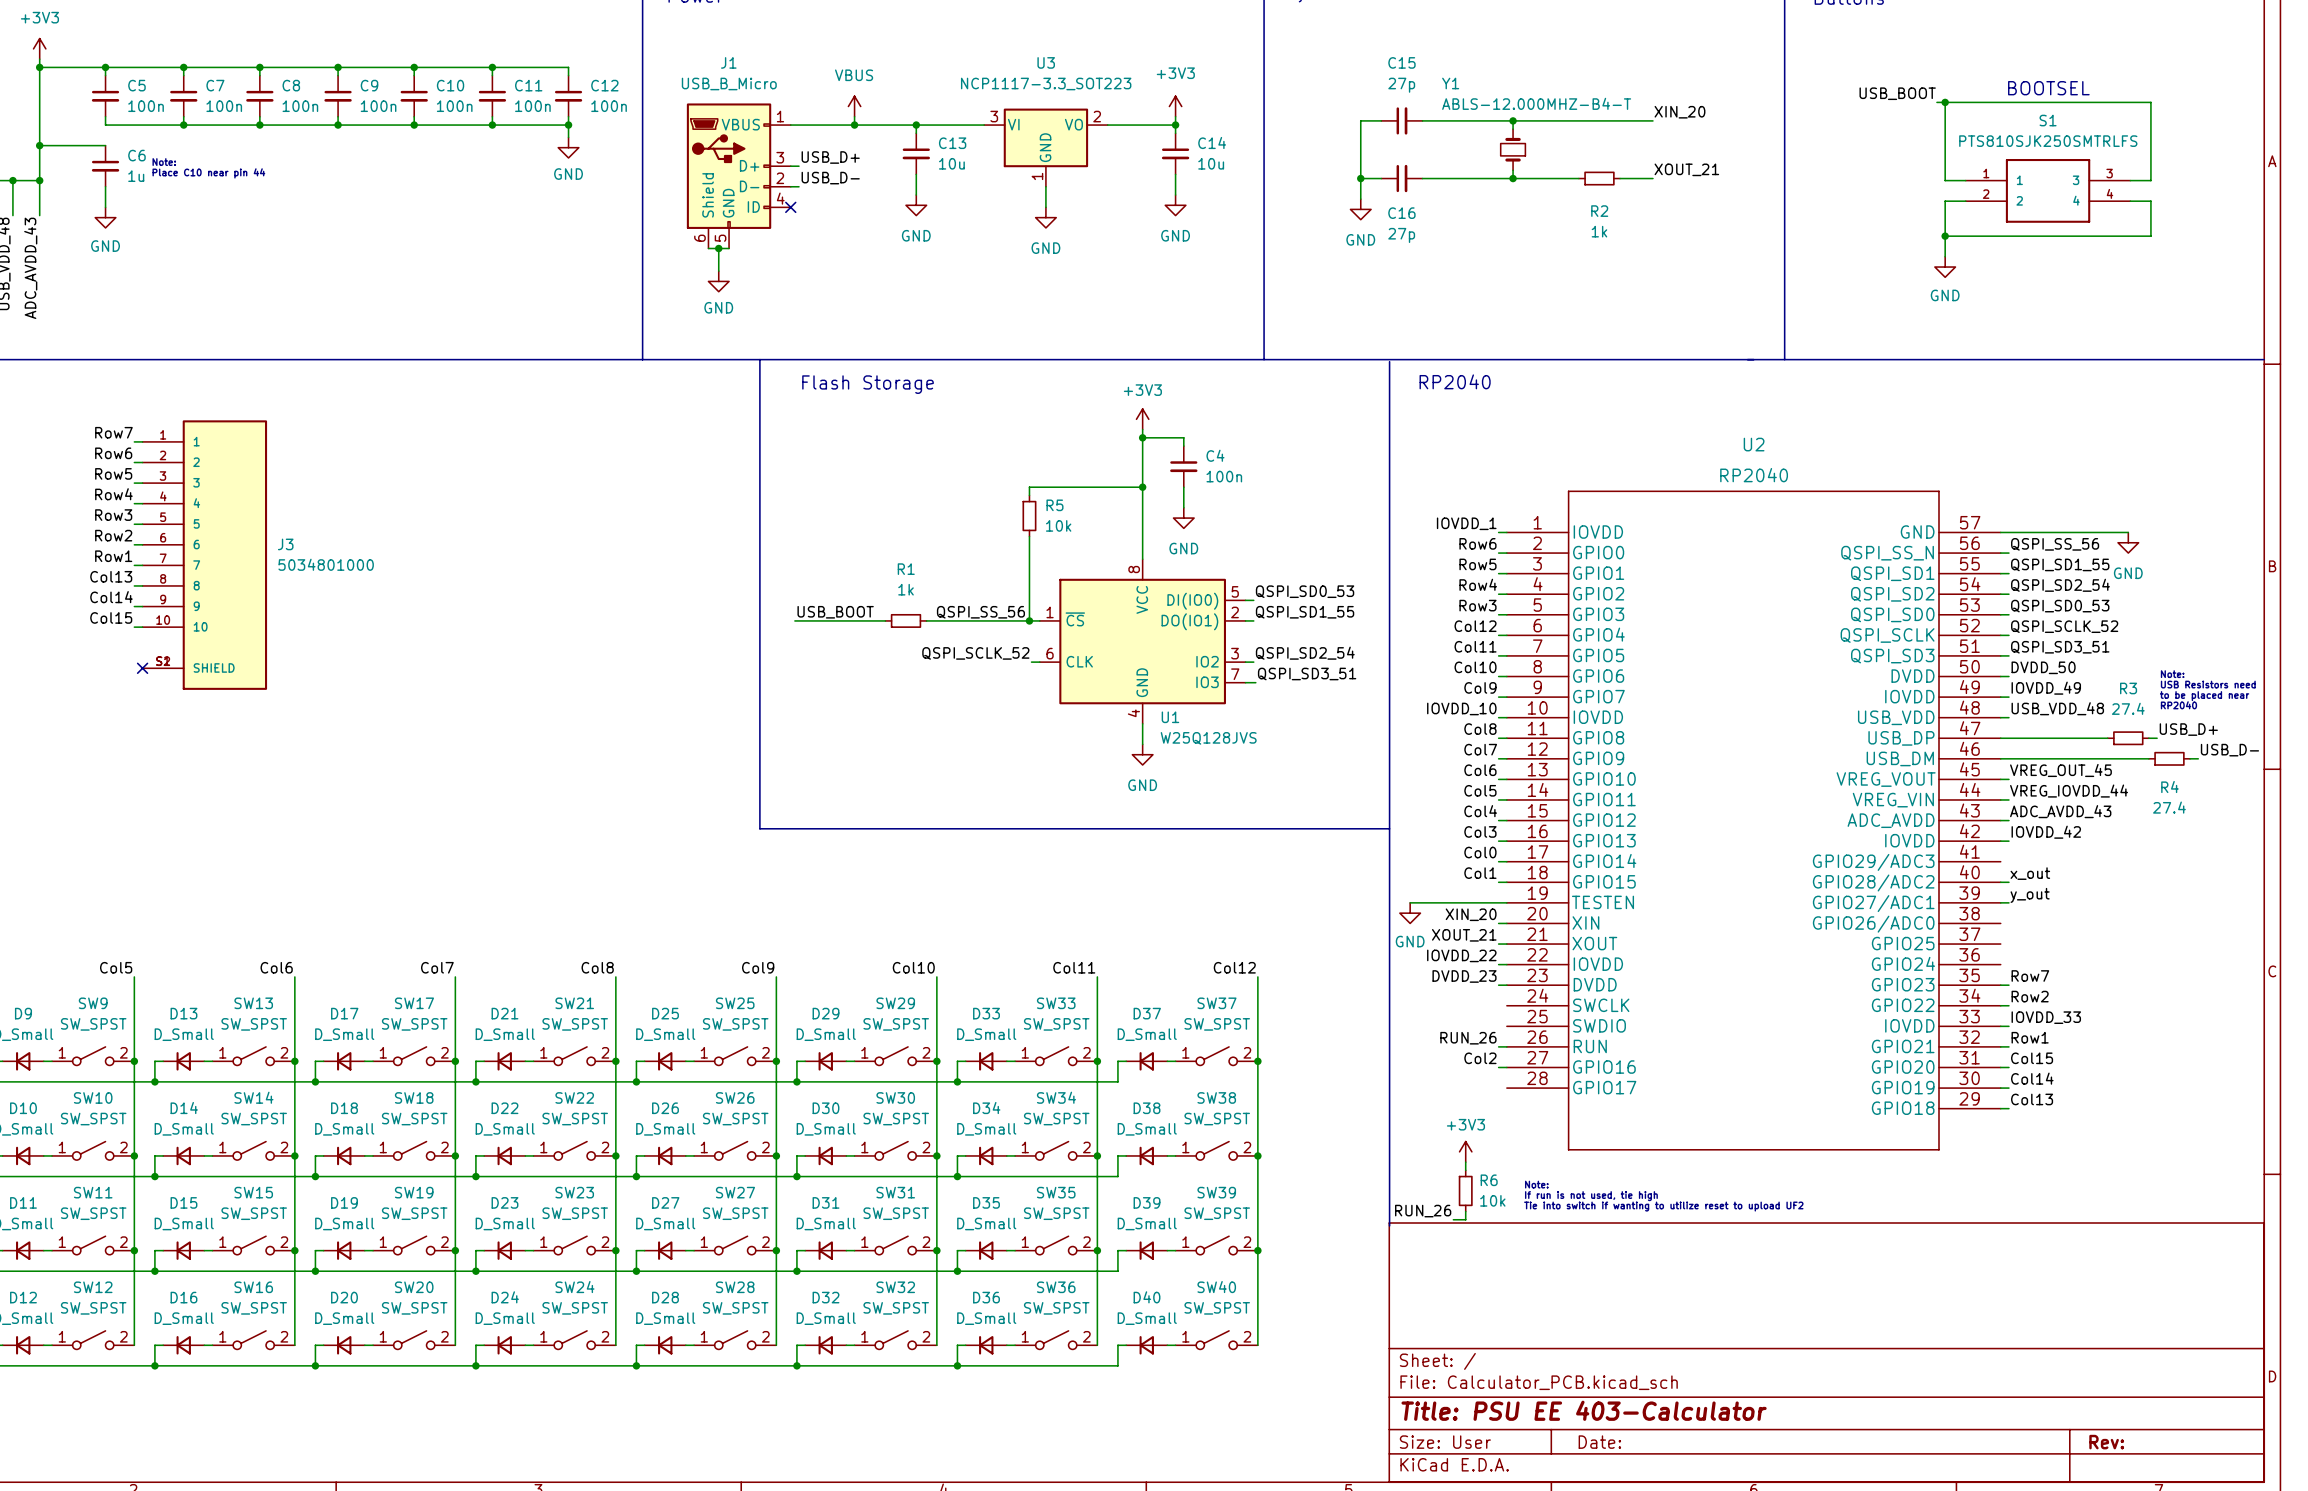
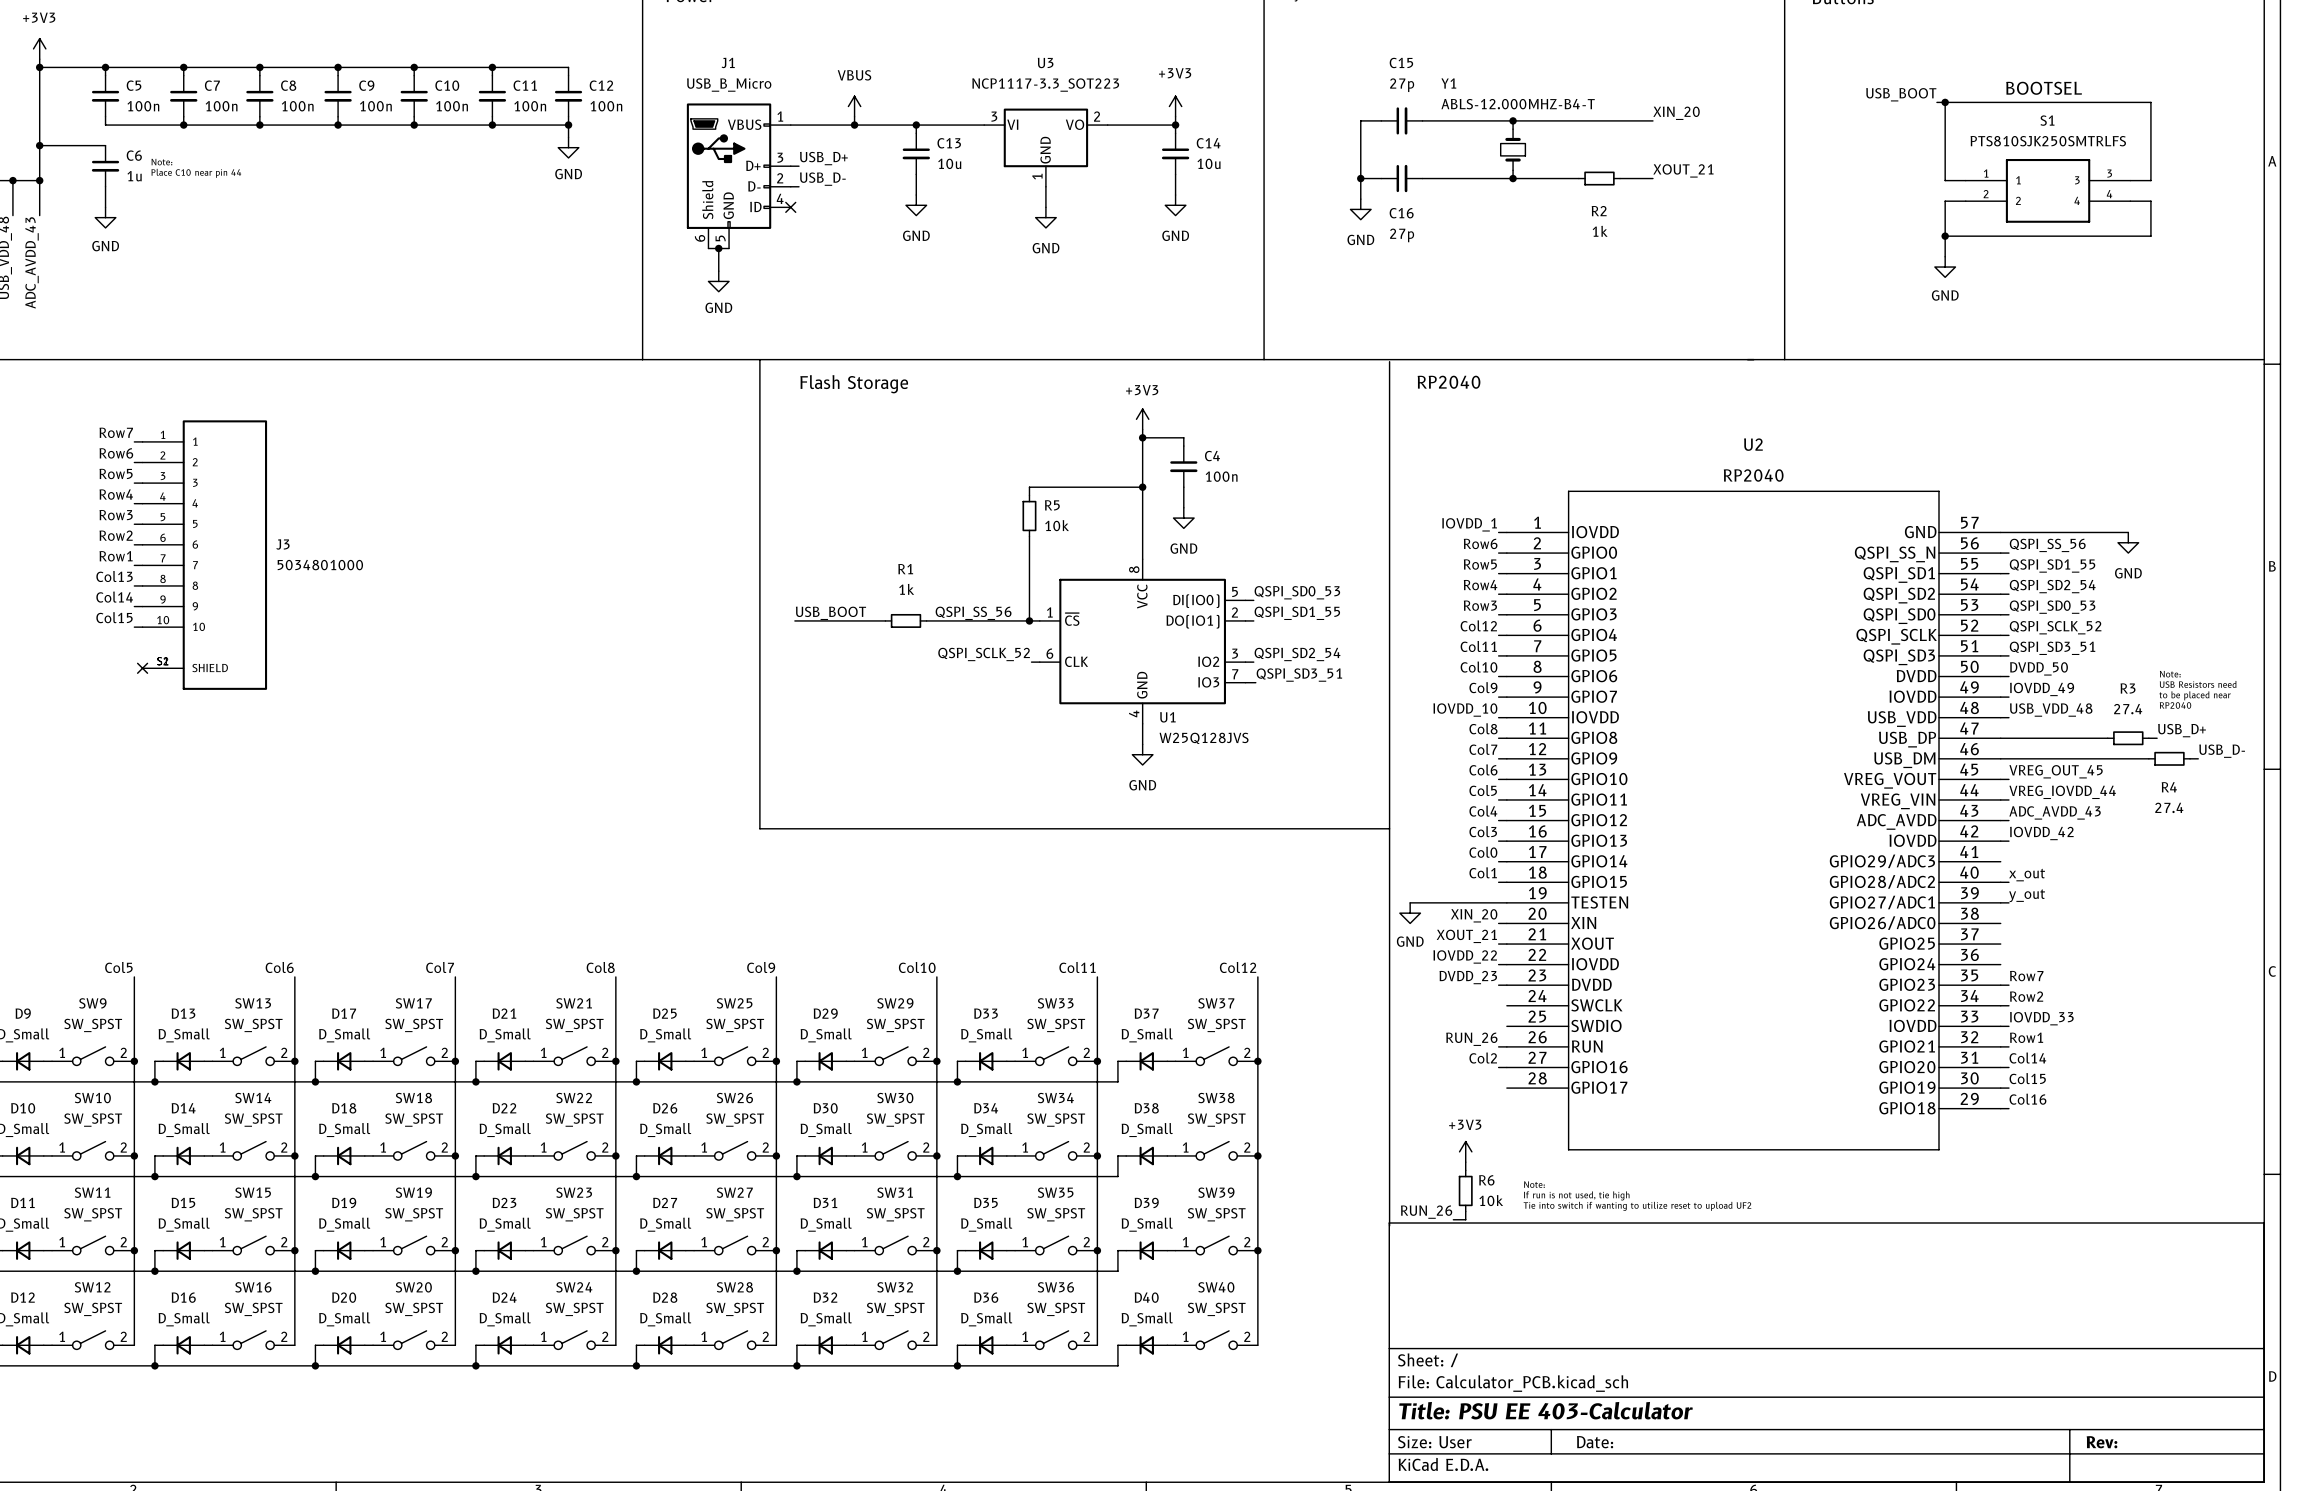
label: Col15 (2032, 1058) -> Col14 (2027, 1058)
label: Col14 (2032, 1078) -> Col15 (2027, 1078)
label: Col13 (2032, 1099) -> Col16 (2027, 1099)

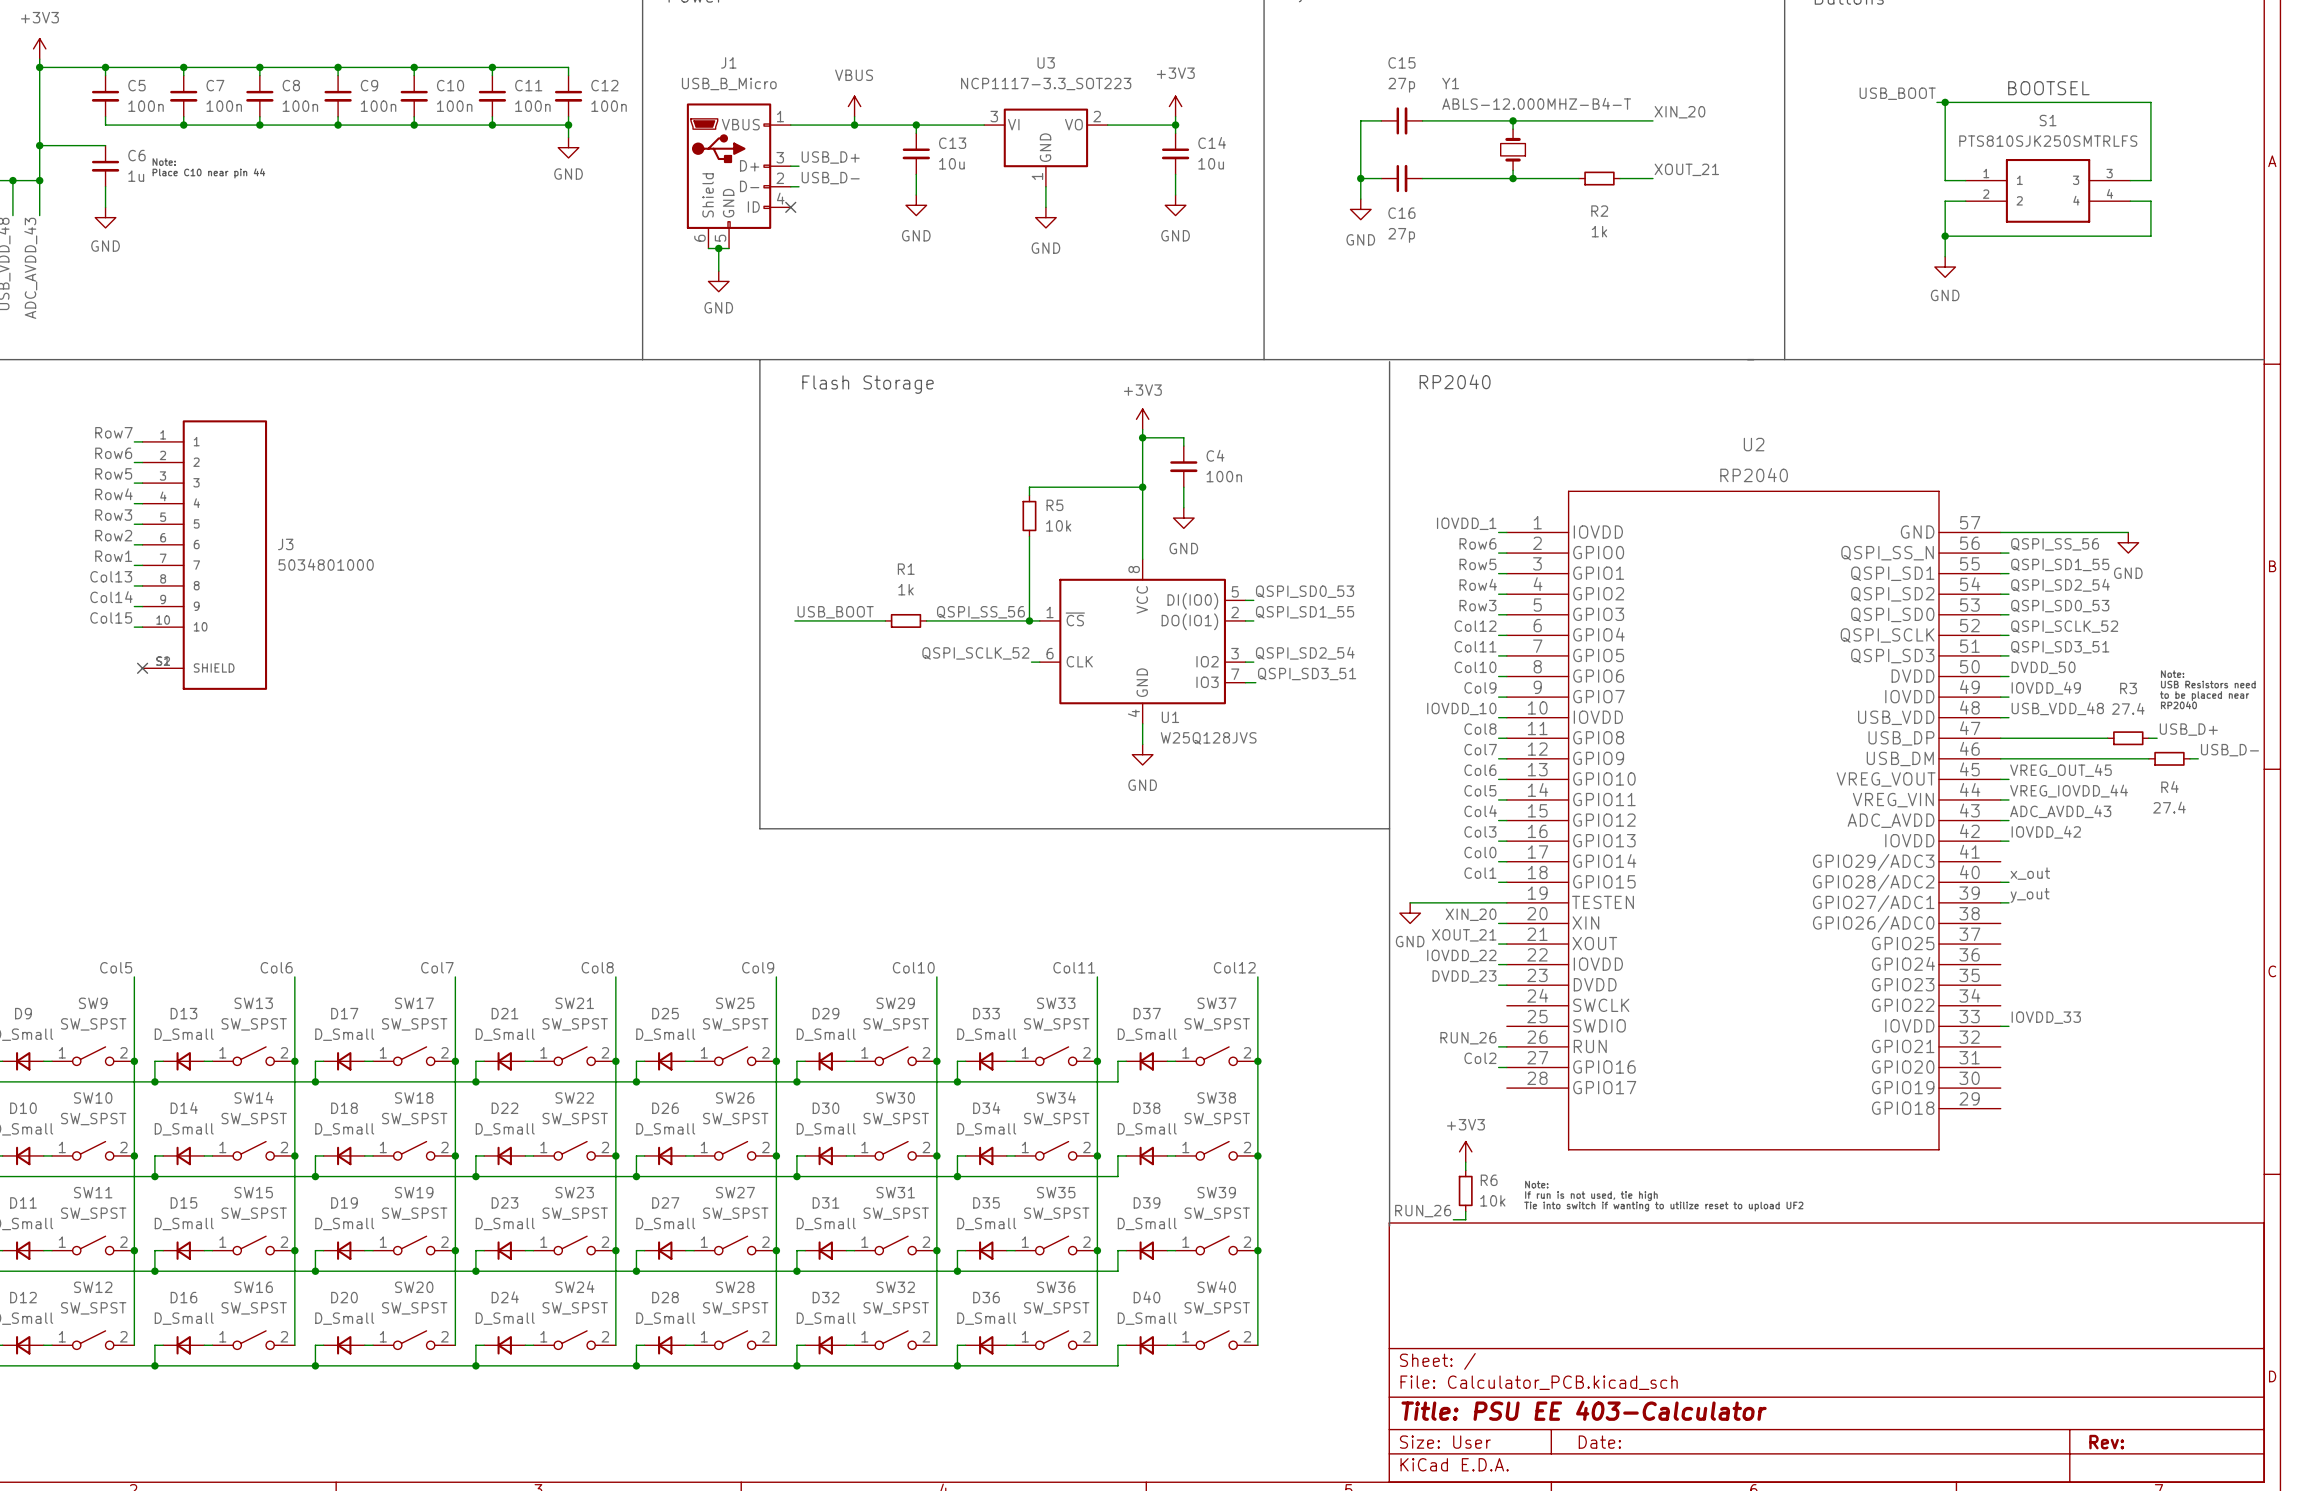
label: Row7 (2026, 976) -> none
wire: (2000, 985) (2008, 985) -> none
label: Row2 (2026, 996) -> none
wire: (2000, 1005) (2008, 1005) -> none
label: Row1 (2026, 1037) -> none
wire: (2000, 1046) (2008, 1046) -> none
label: Col14 (2027, 1058) -> none
wire: (2000, 1067) (2008, 1067) -> none
label: Col15 (2027, 1078) -> none
wire: (2000, 1088) (2008, 1088) -> none
label: Col16 (2027, 1099) -> none
wire: (2000, 1108) (2008, 1108) -> none

